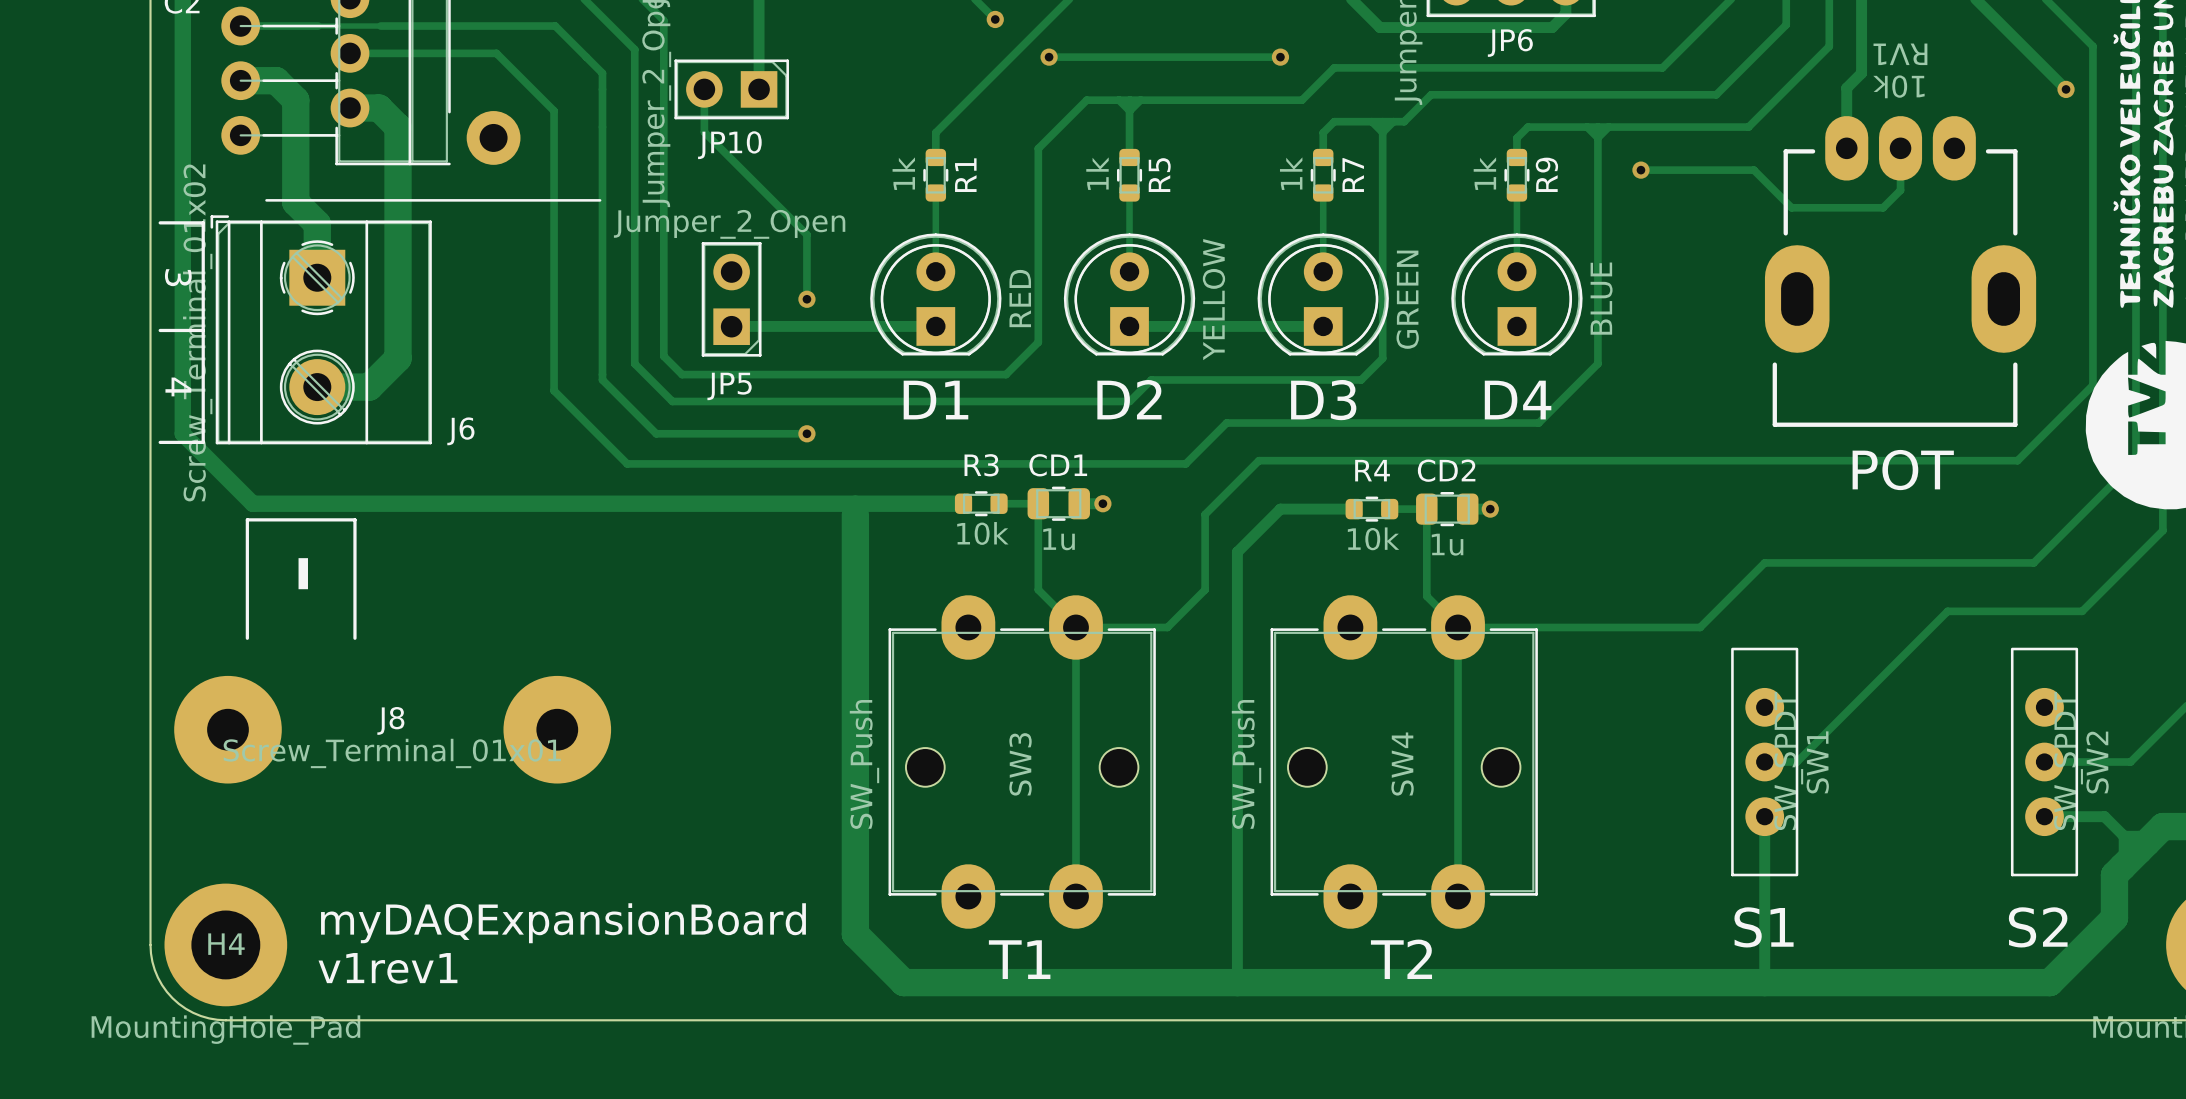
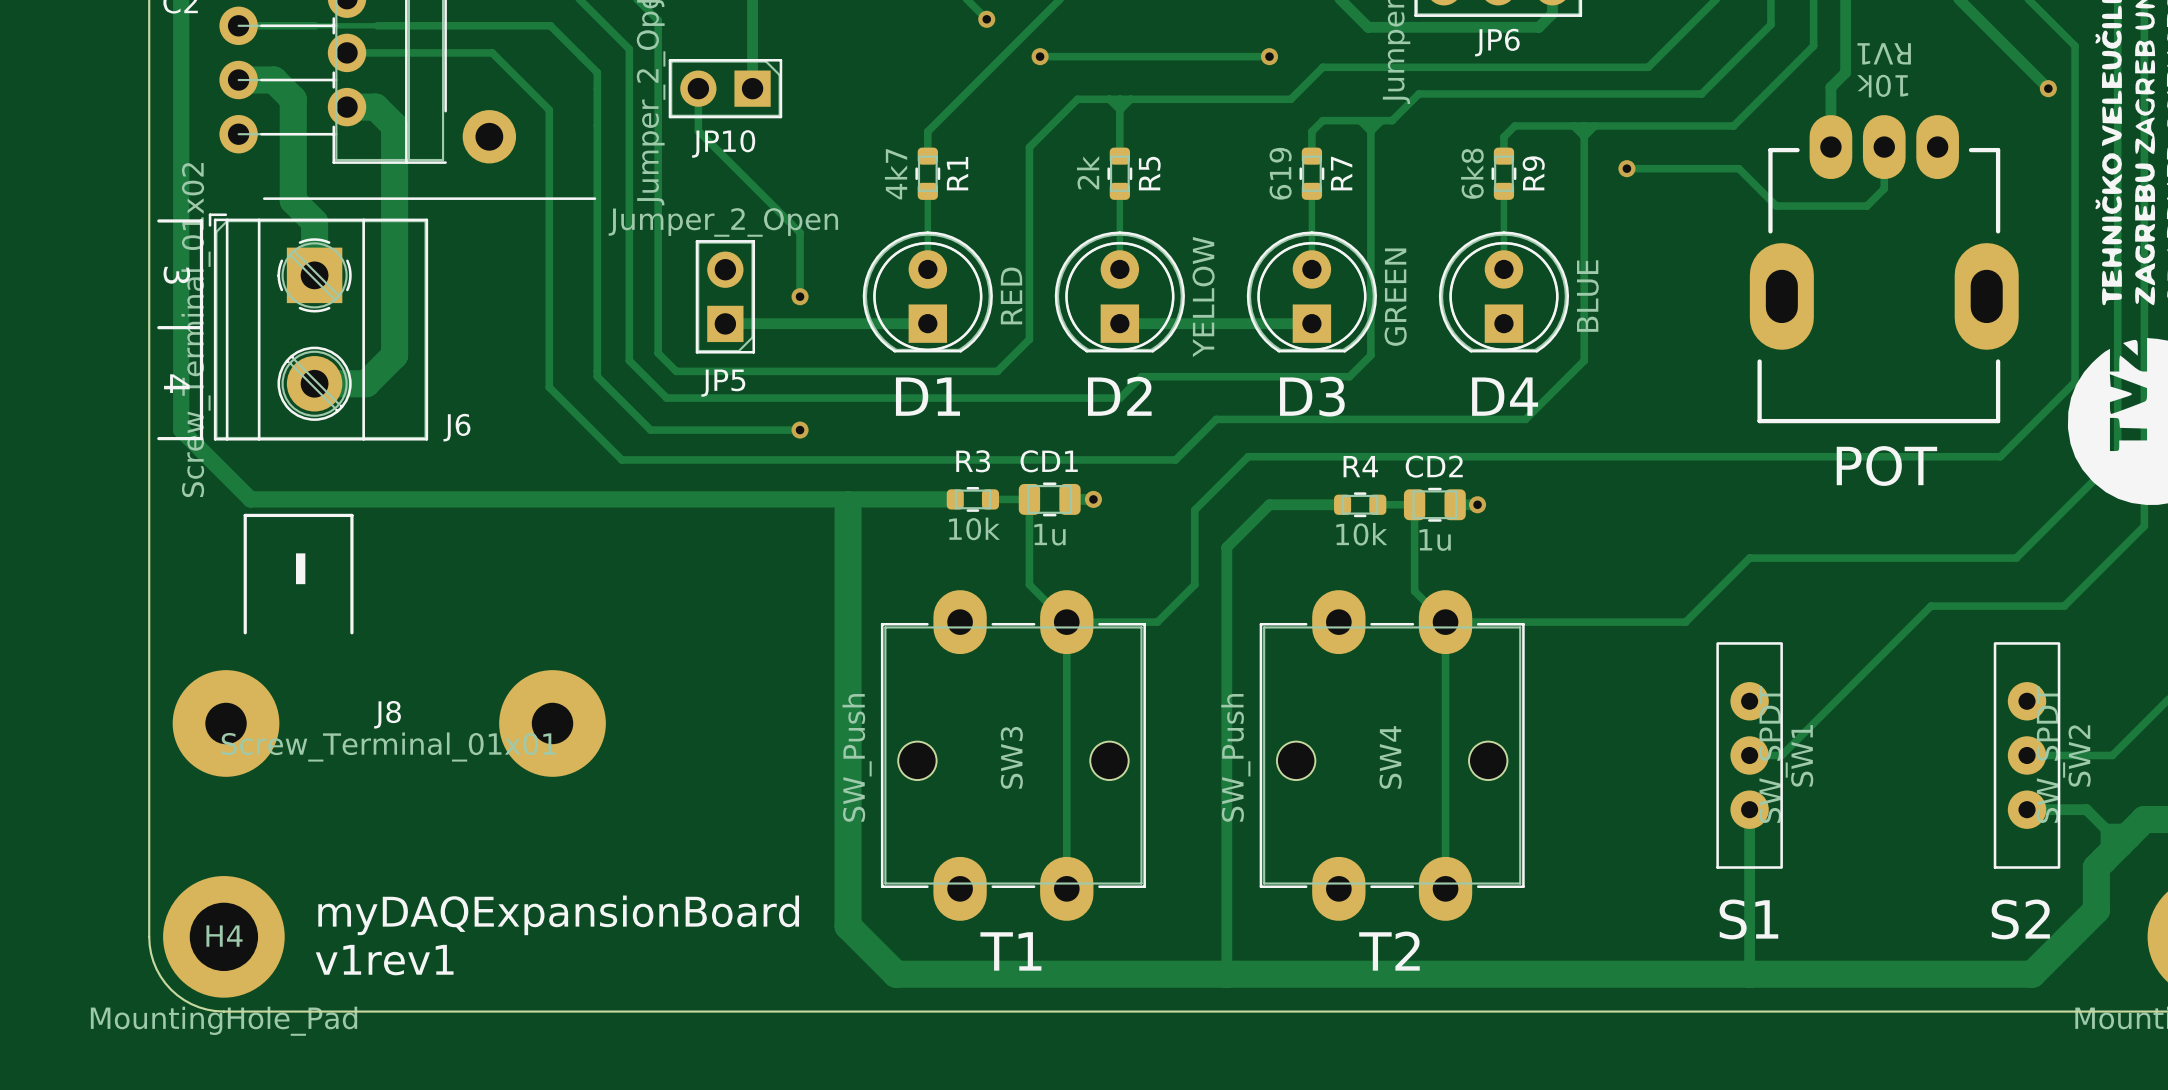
R1 value: 1k (903, 173) -> 4k7 (896, 174)
R5 value: 1k (1097, 173) -> 2k (1088, 172)
R7 value: 1k (1291, 173) -> 619 (1280, 173)
R9 value: 1k (1484, 173) -> 6k8 (1472, 173)

